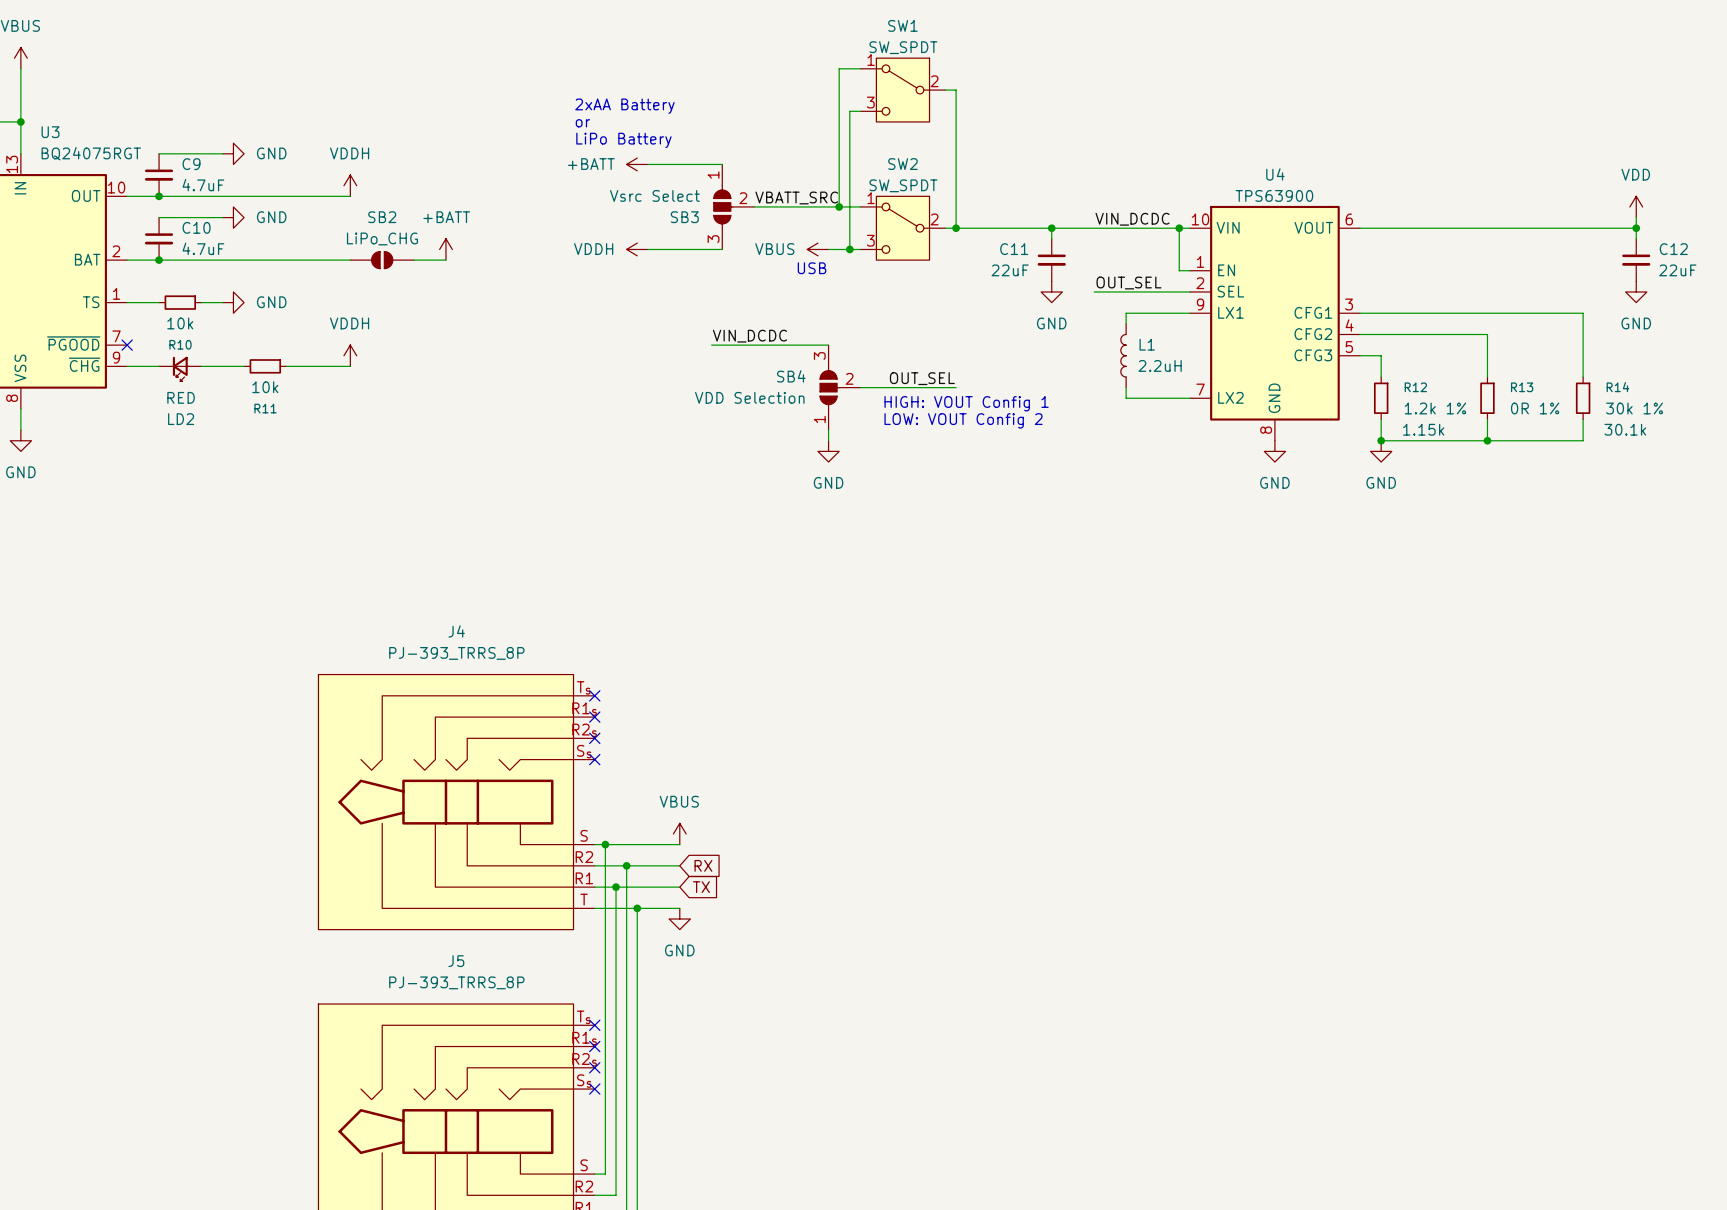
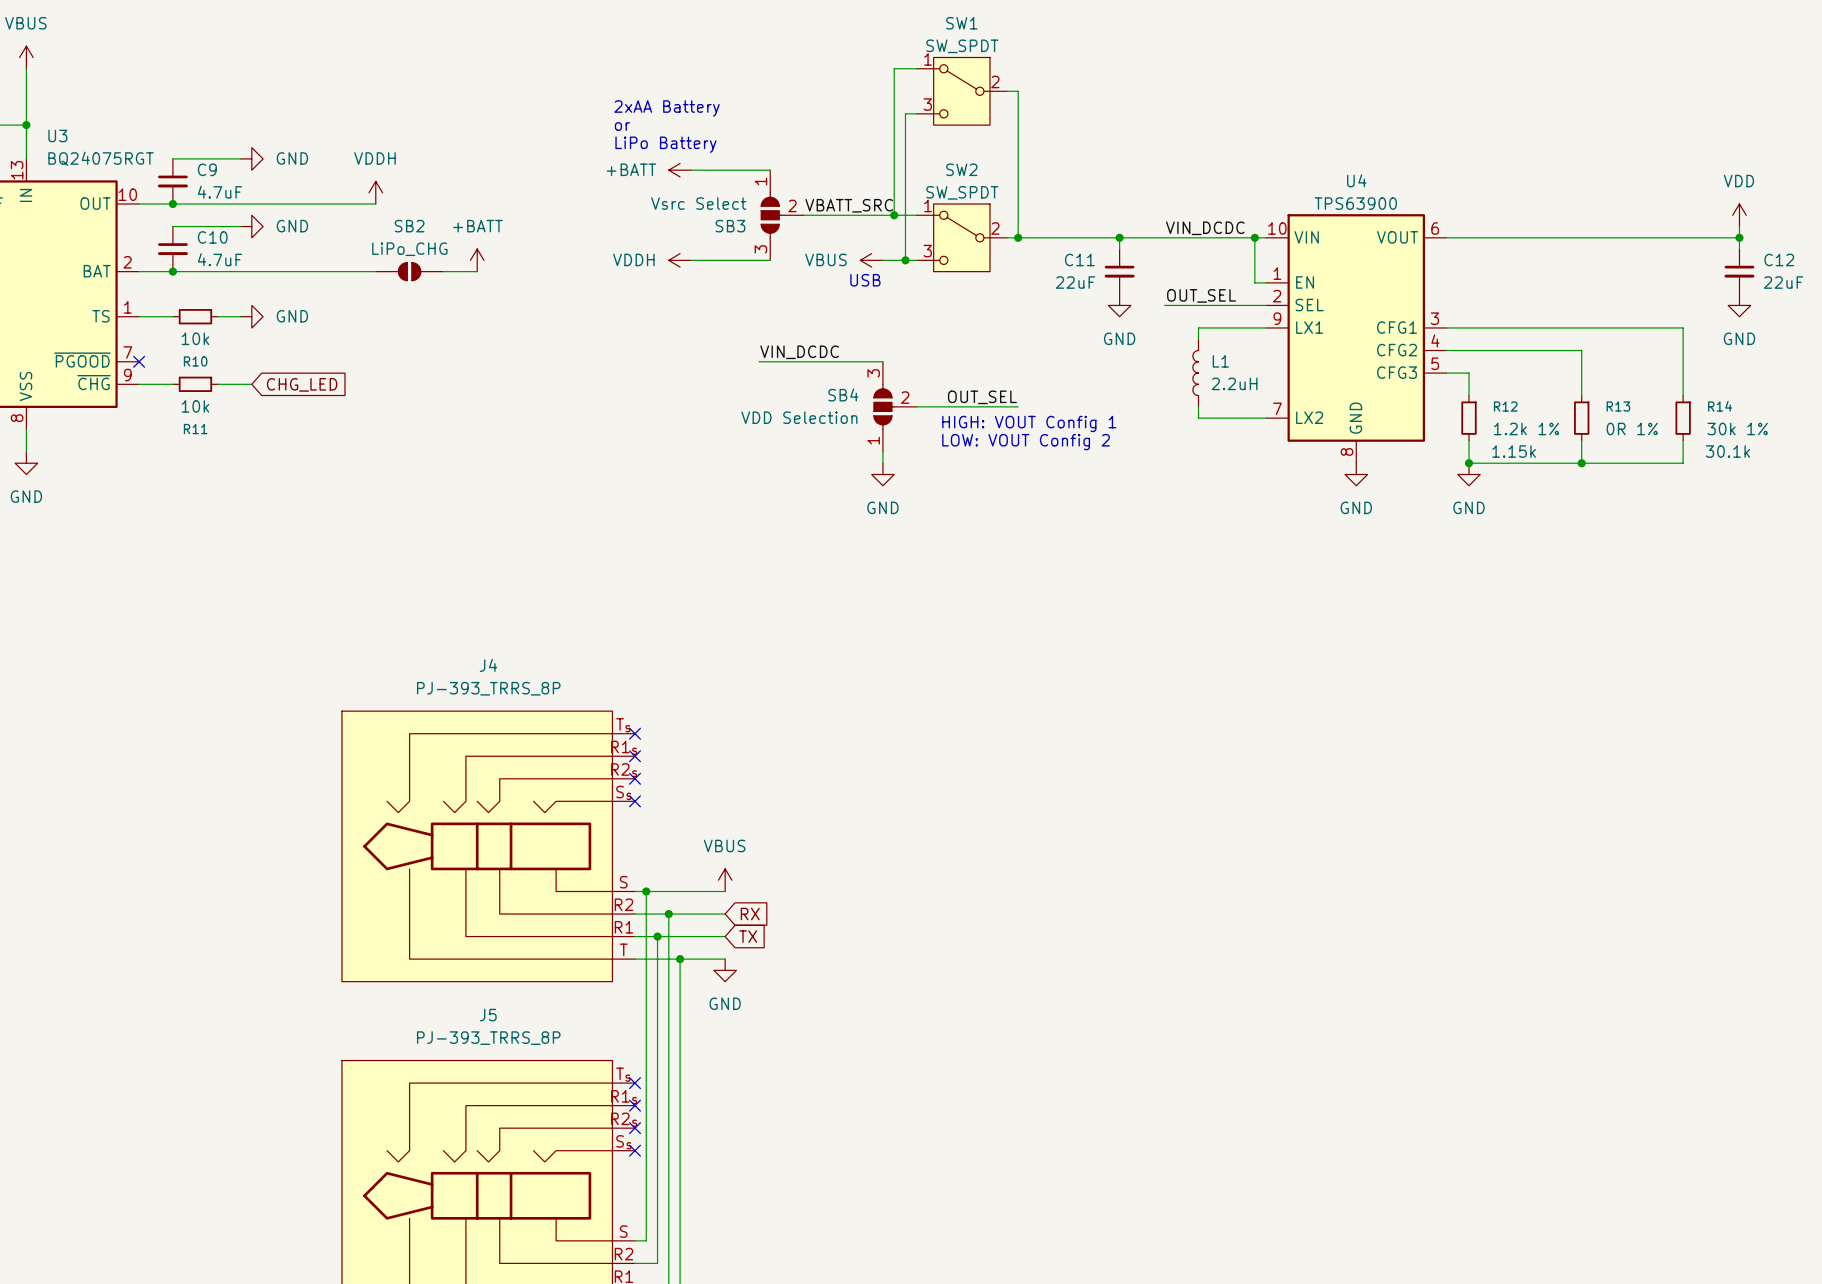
power symbol: VDDH (350, 355) -> none
wire: (233, 366) (244, 366) -> none
R11 position: (265, 366) -> (195, 384)
global label: none -> CHG_LED (302, 384)
wire: (286, 366) (350, 366) -> none
LD2: RED (180, 369) -> none

